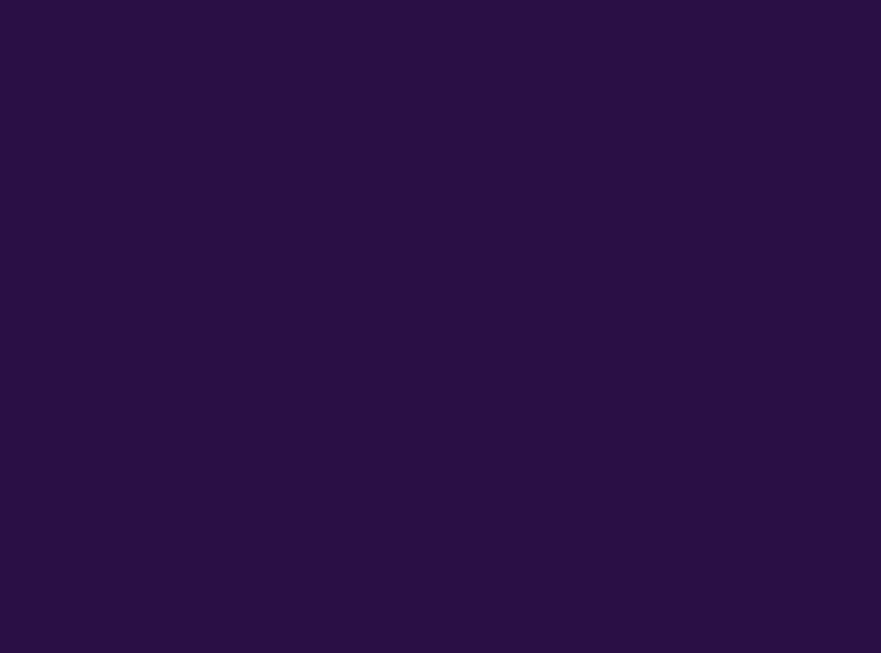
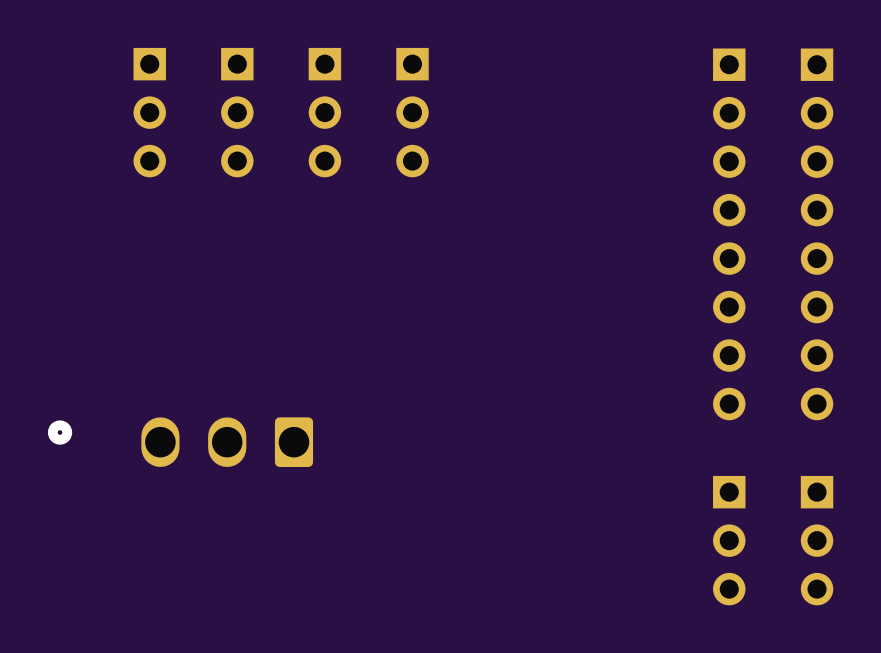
part: none -> (149, 112)
part: none -> (237, 112)
part: none -> (324, 112)
part: none -> (412, 112)
part: none -> (729, 234)
part: none -> (817, 234)
part: none -> (60, 432)
part: none -> (227, 442)
part: none -> (729, 540)
part: none -> (817, 540)

